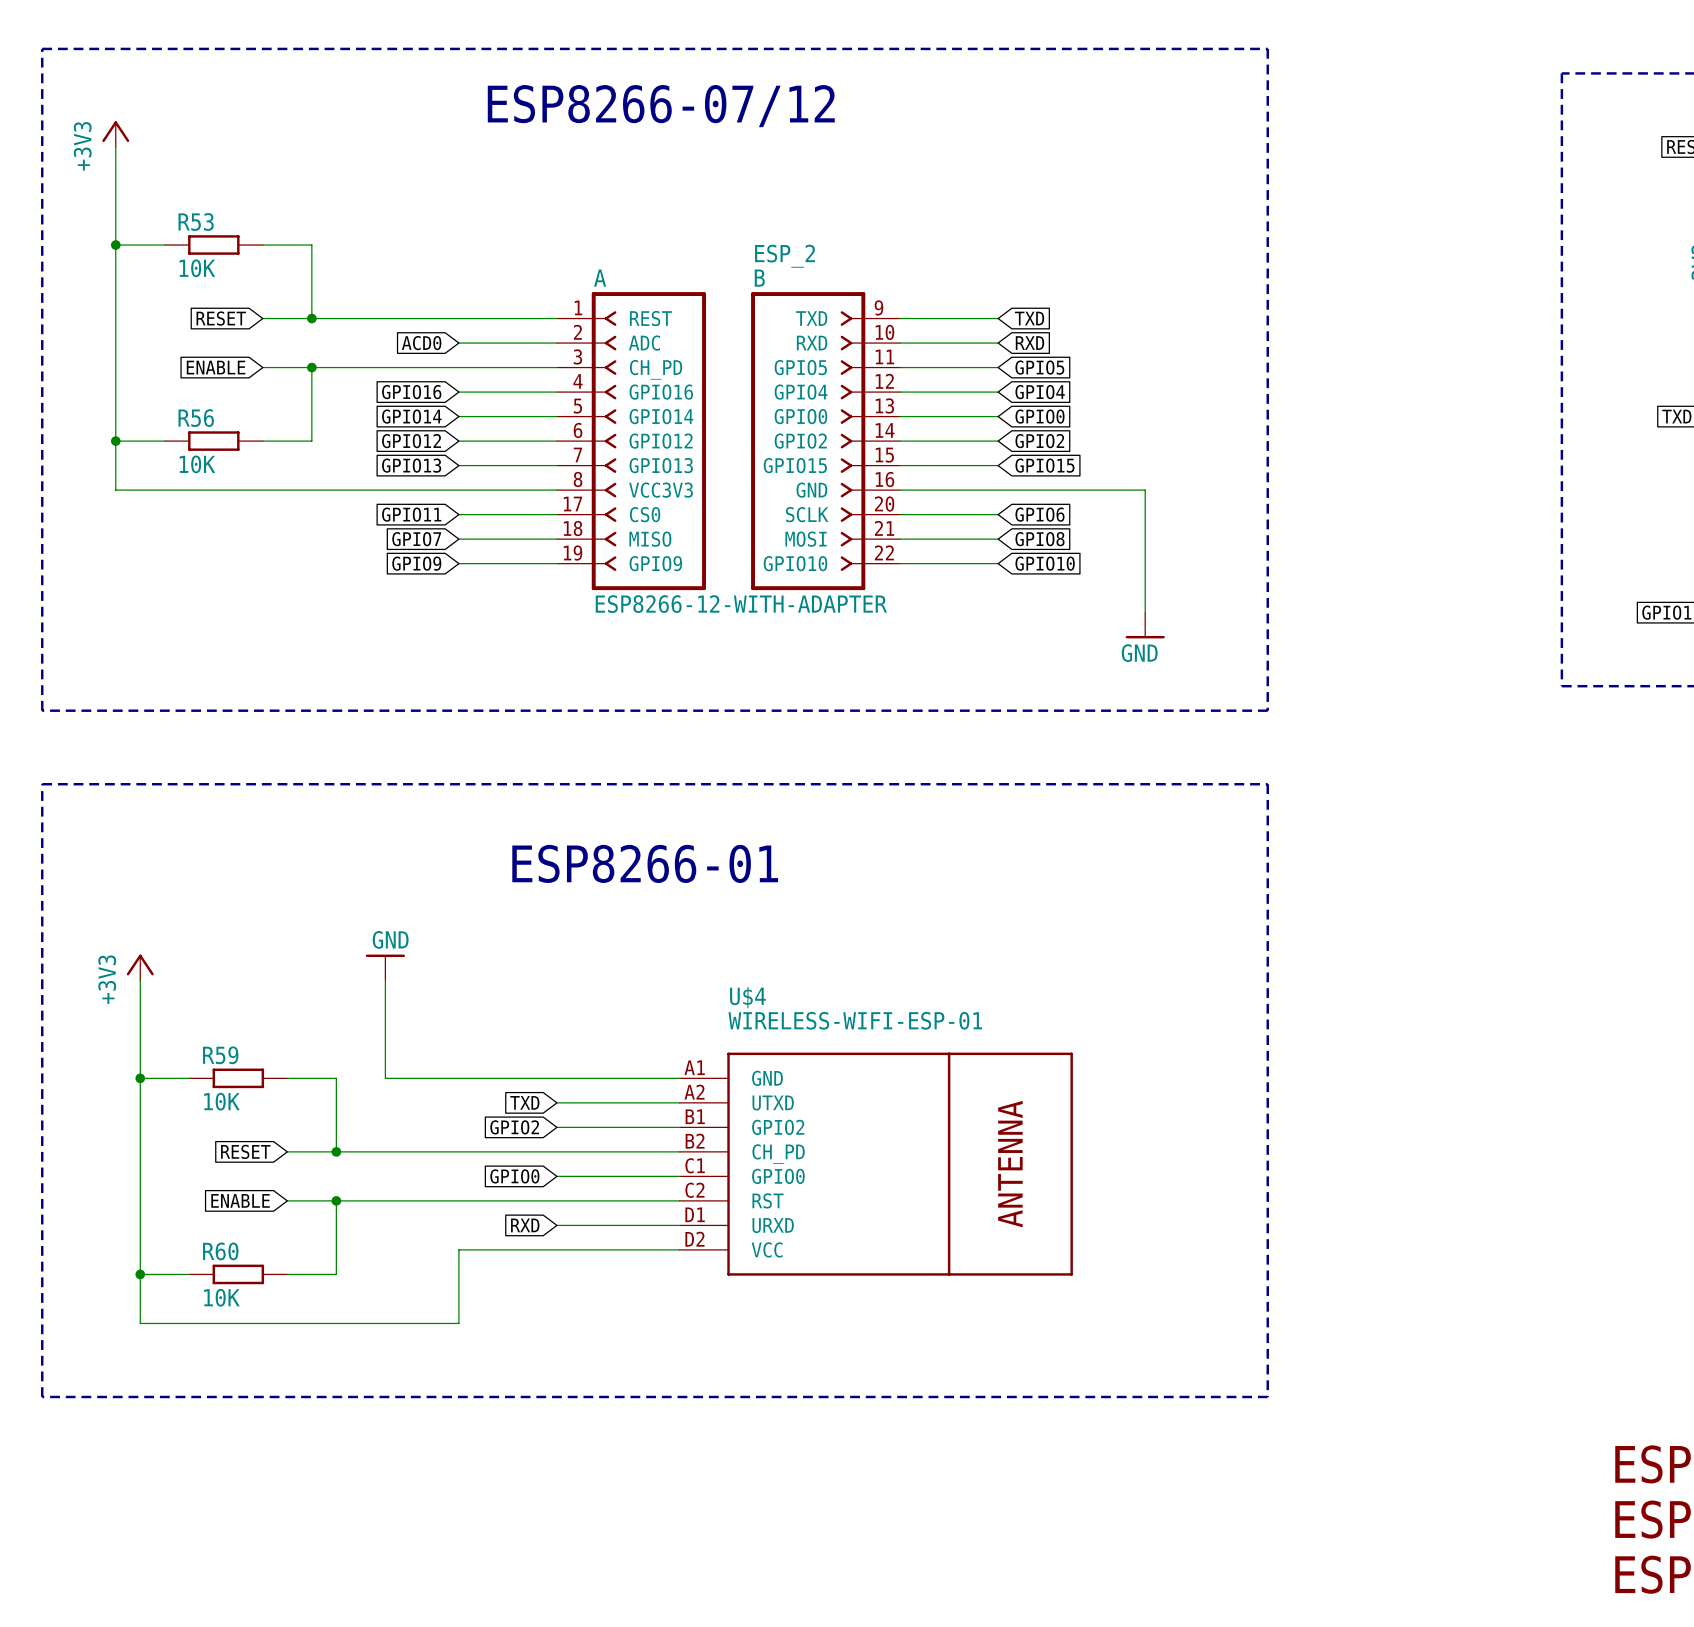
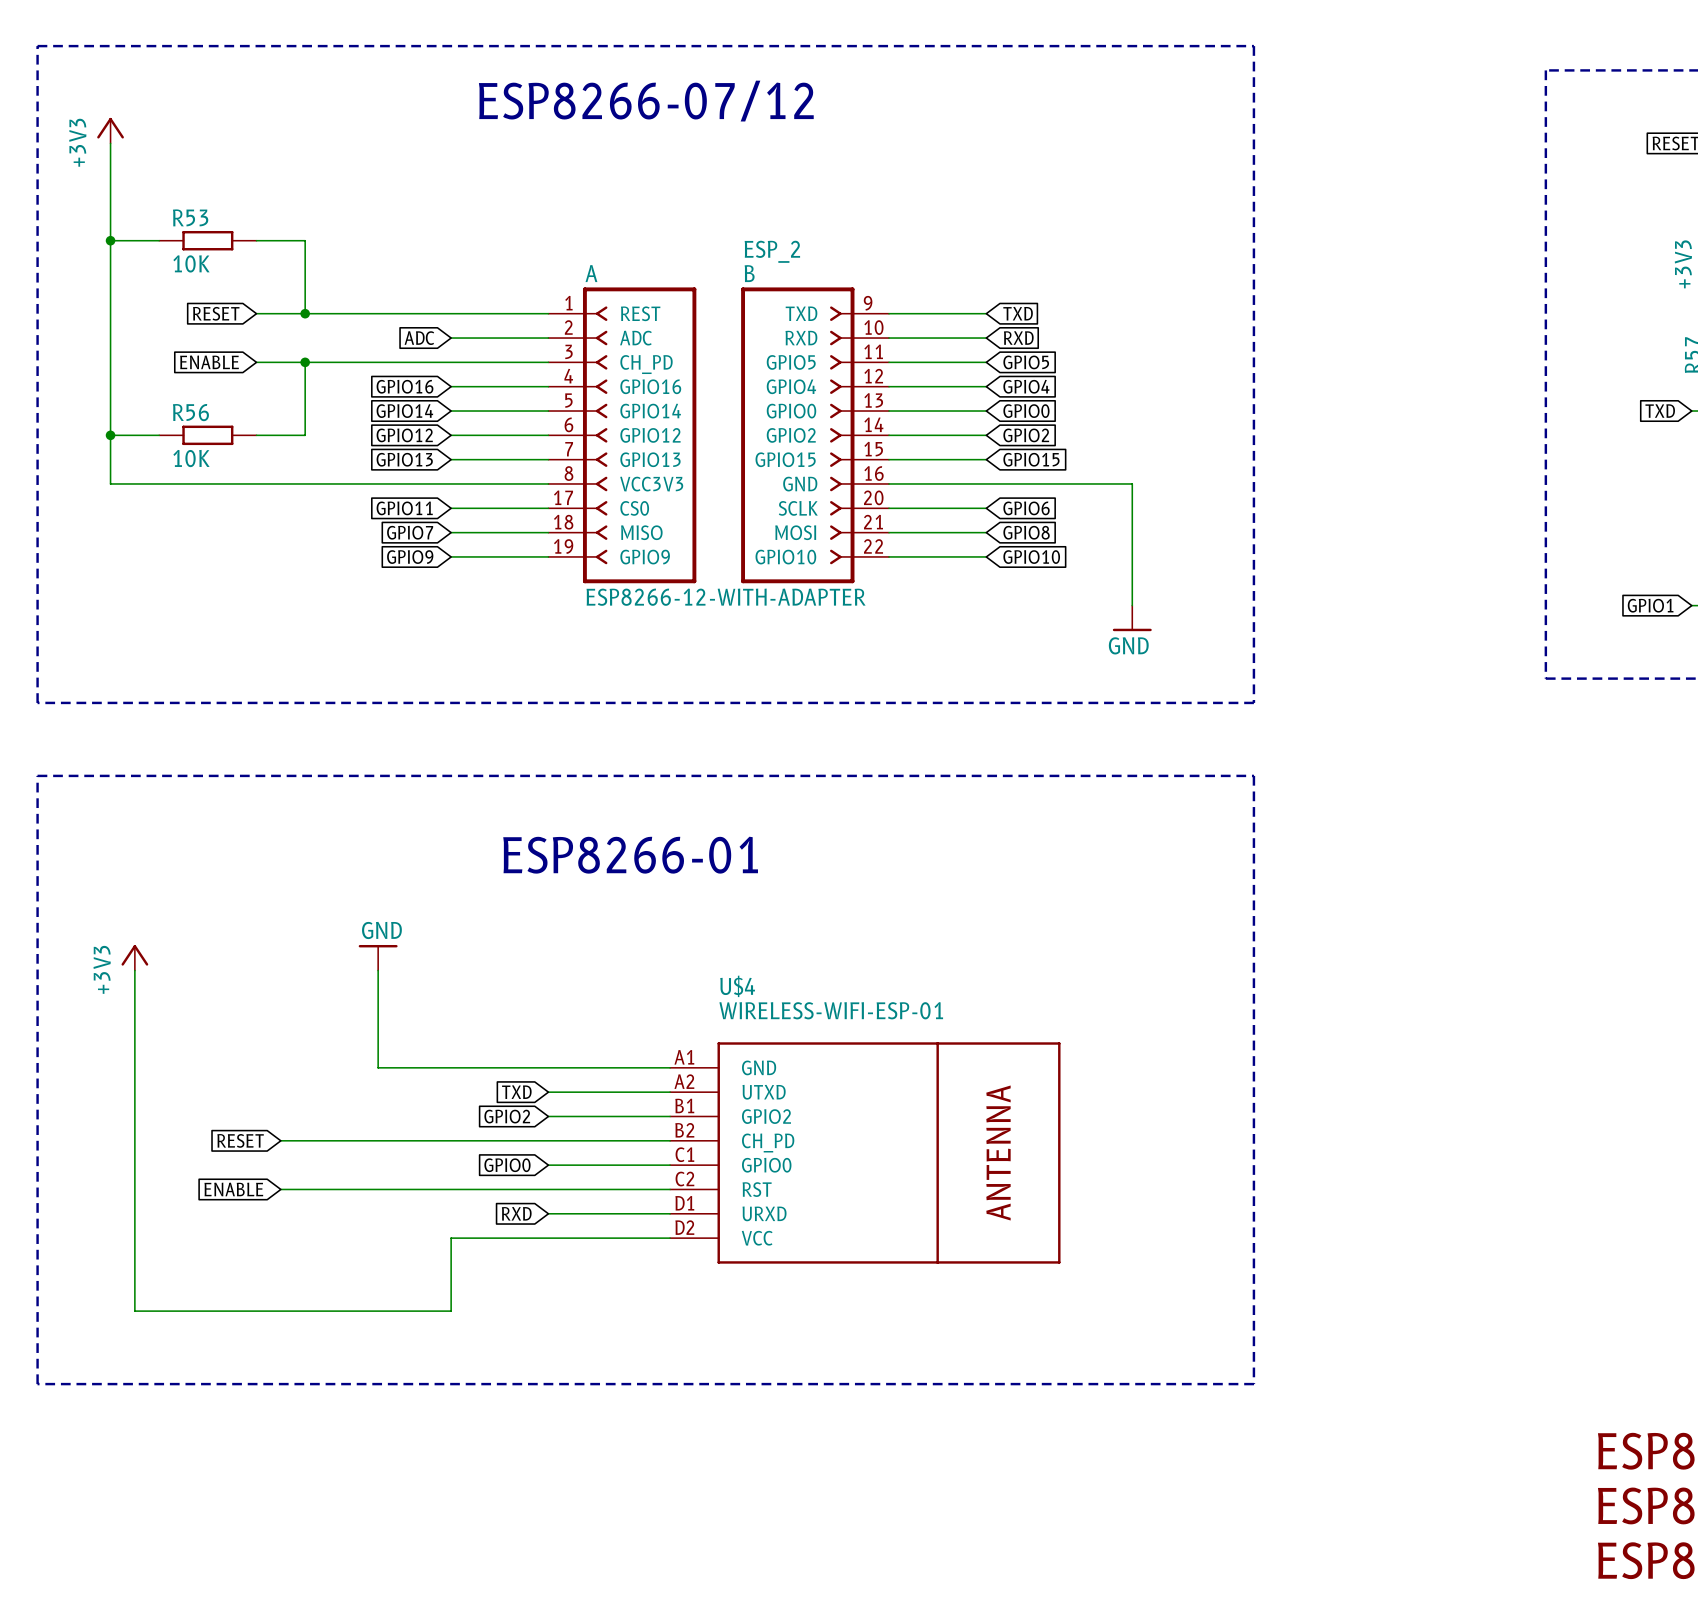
global label: ACD0 (421, 343) -> ADC (419, 338)
wire: (140, 1078) (189, 1078) -> none
junction: (140, 1078) -> none
R59: 10K (238, 1078) -> none
wire: (287, 1078) (336, 1078) (336, 1151) -> none
junction: (336, 1151) -> none
wire: (336, 1200) (336, 1274) (287, 1274) -> none
junction: (336, 1200) -> none
wire: (140, 1274) (189, 1274) -> none
junction: (140, 1274) -> none
R60: 10K (238, 1274) -> none

